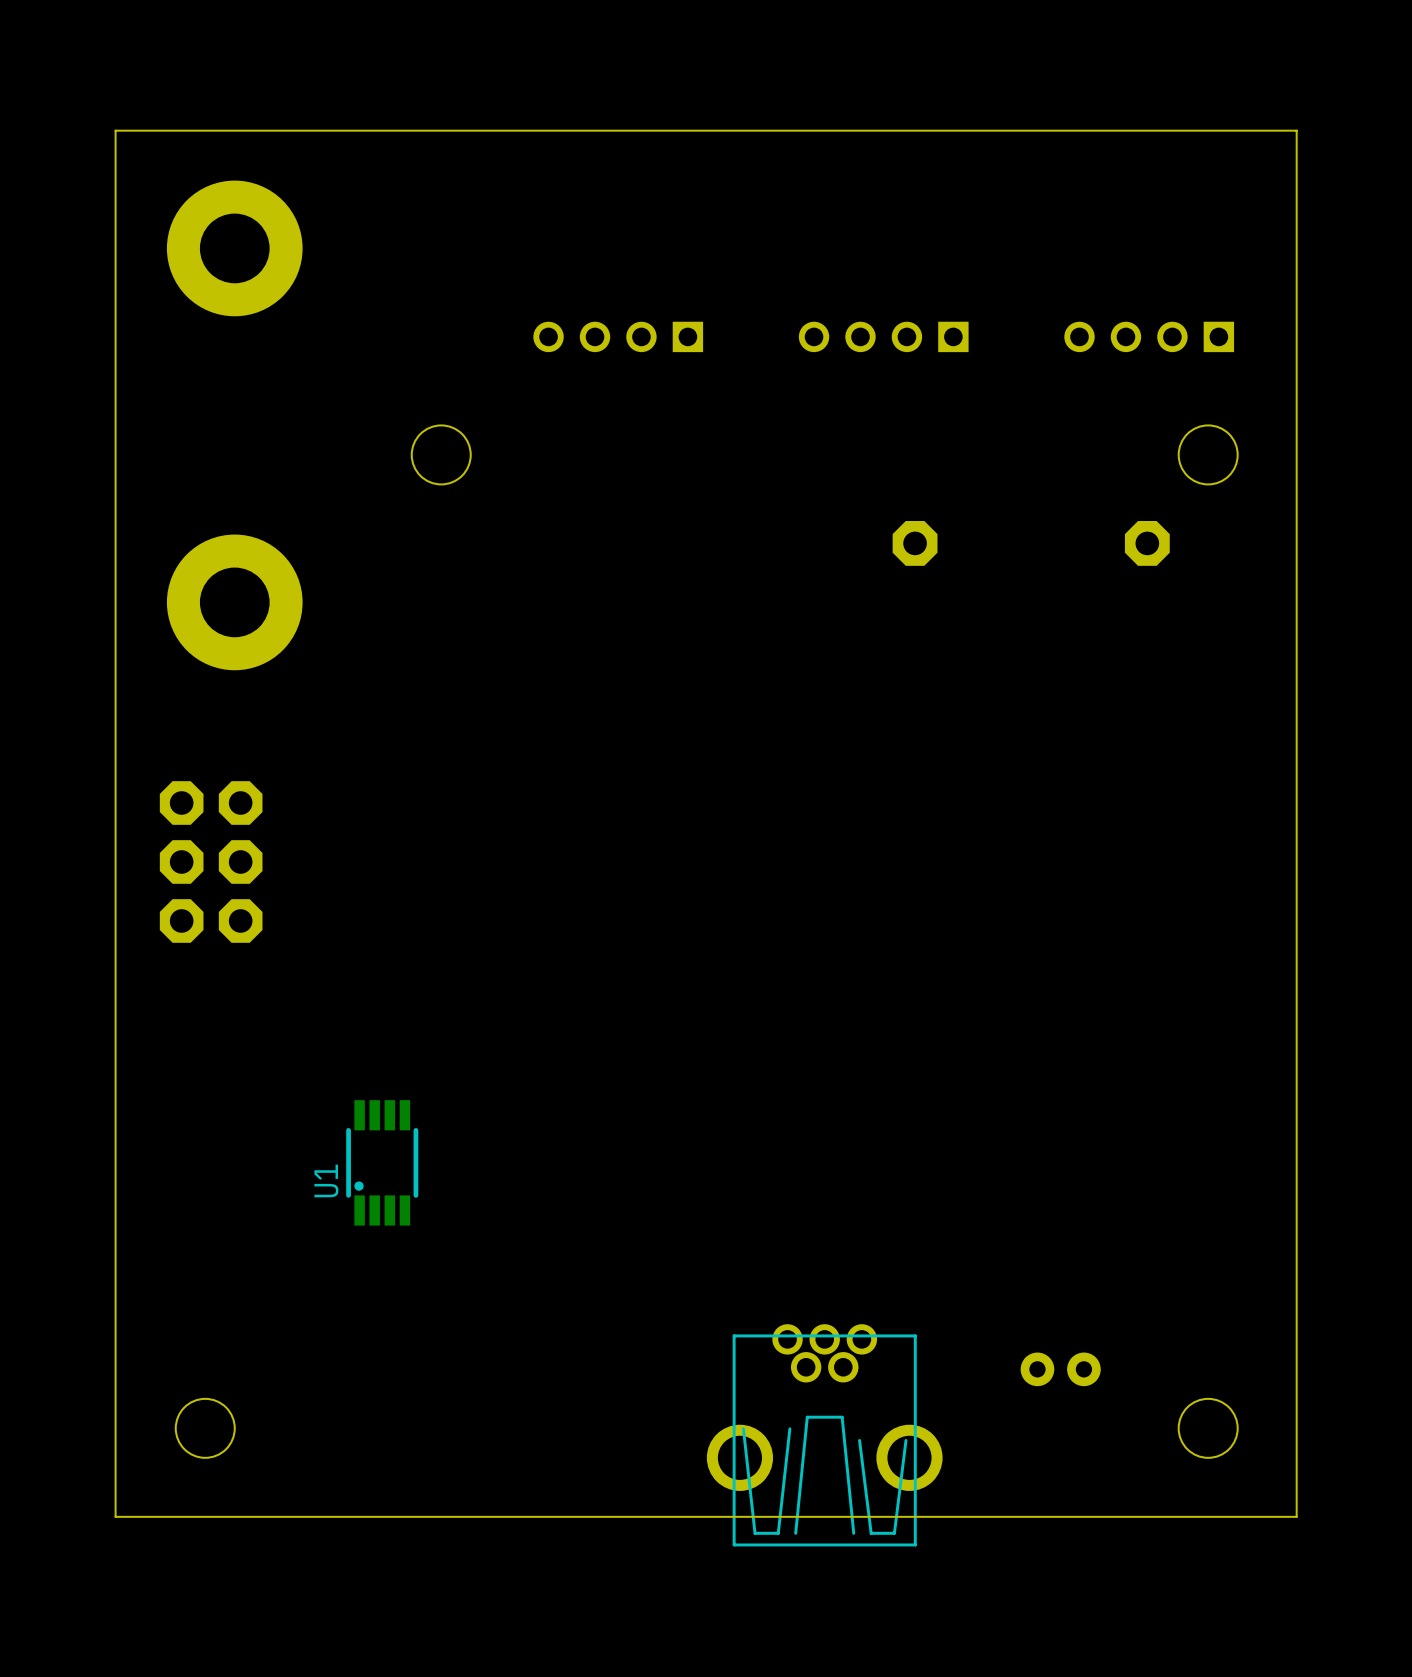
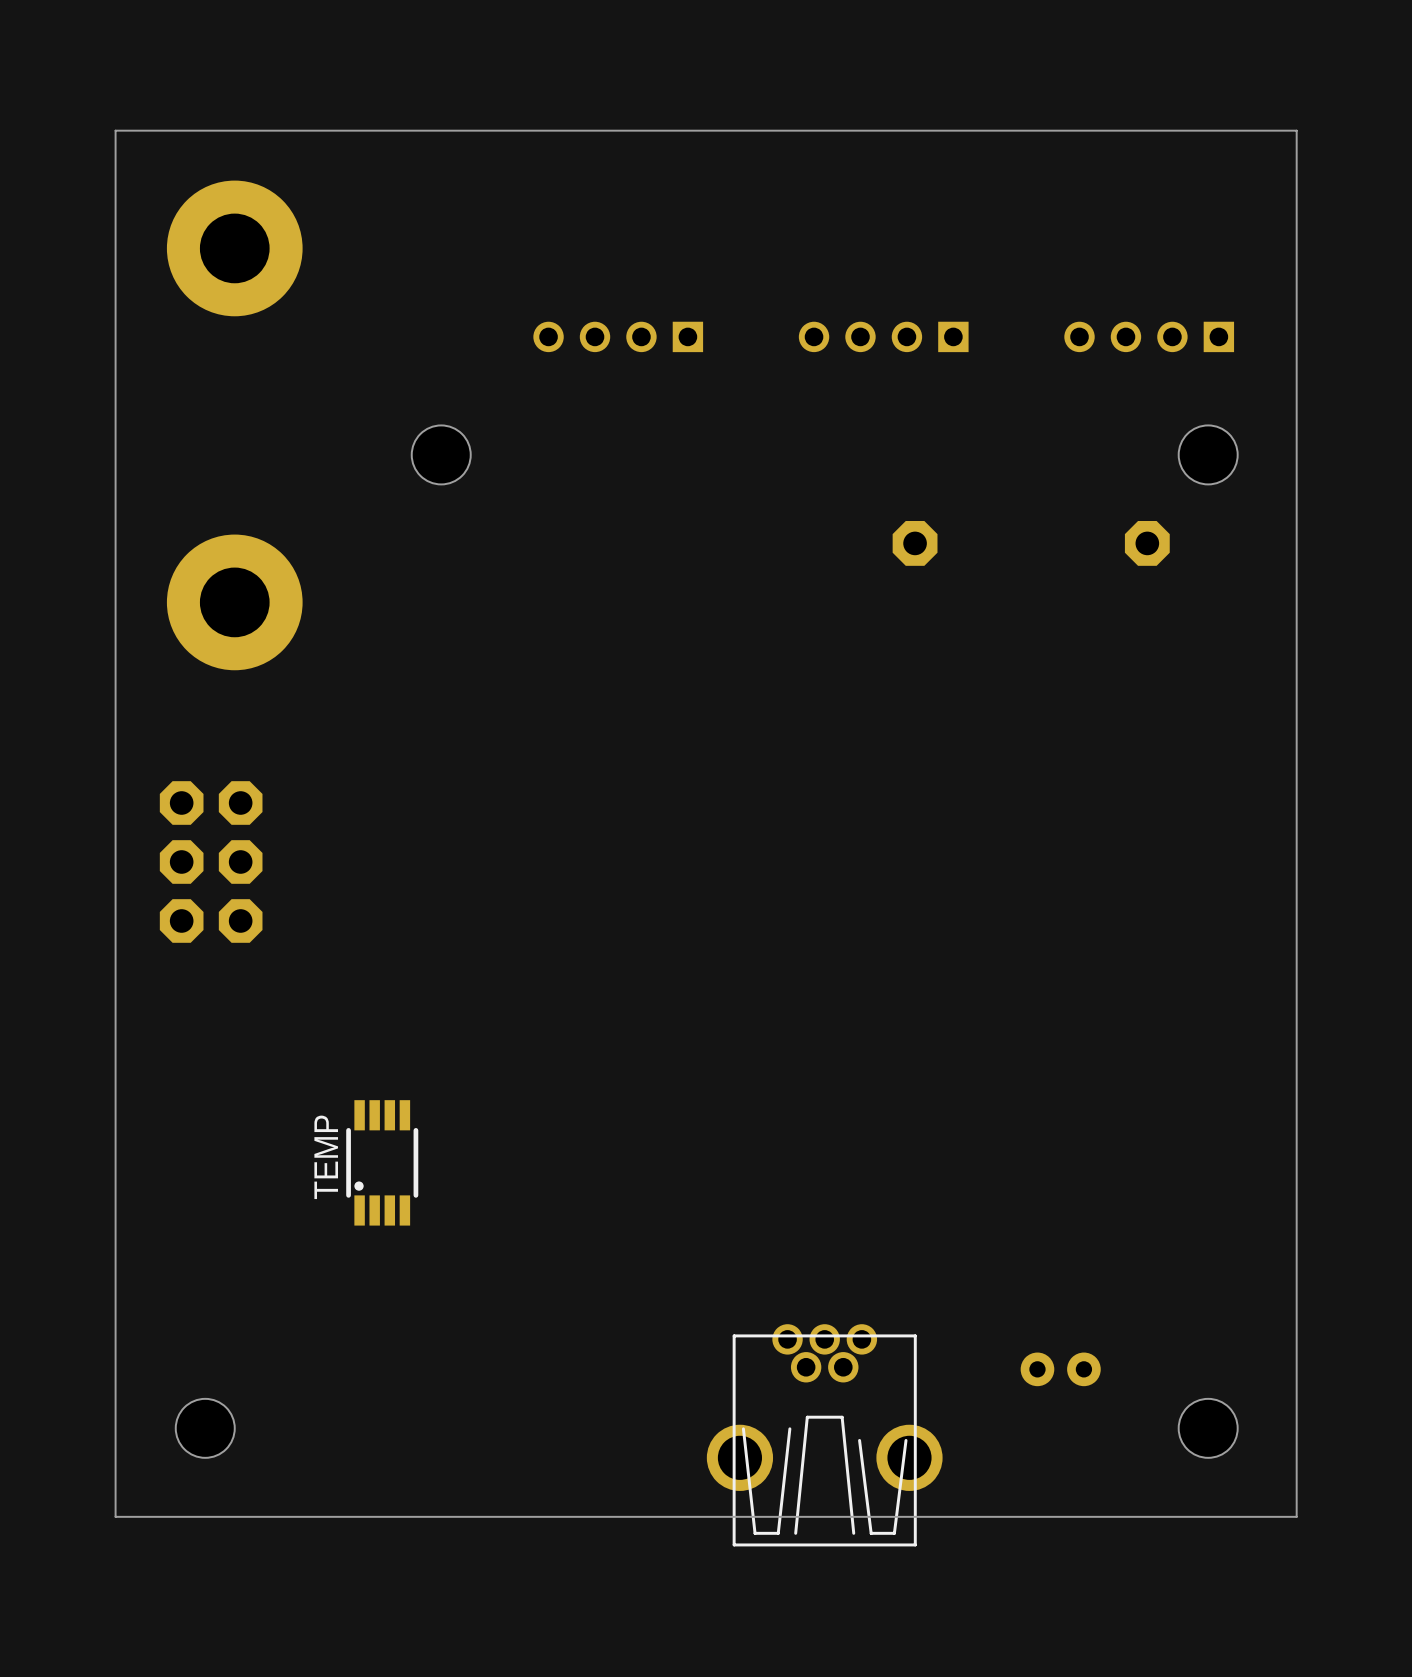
U1 name: U1 (326, 1180) -> TEMP (326, 1157)

